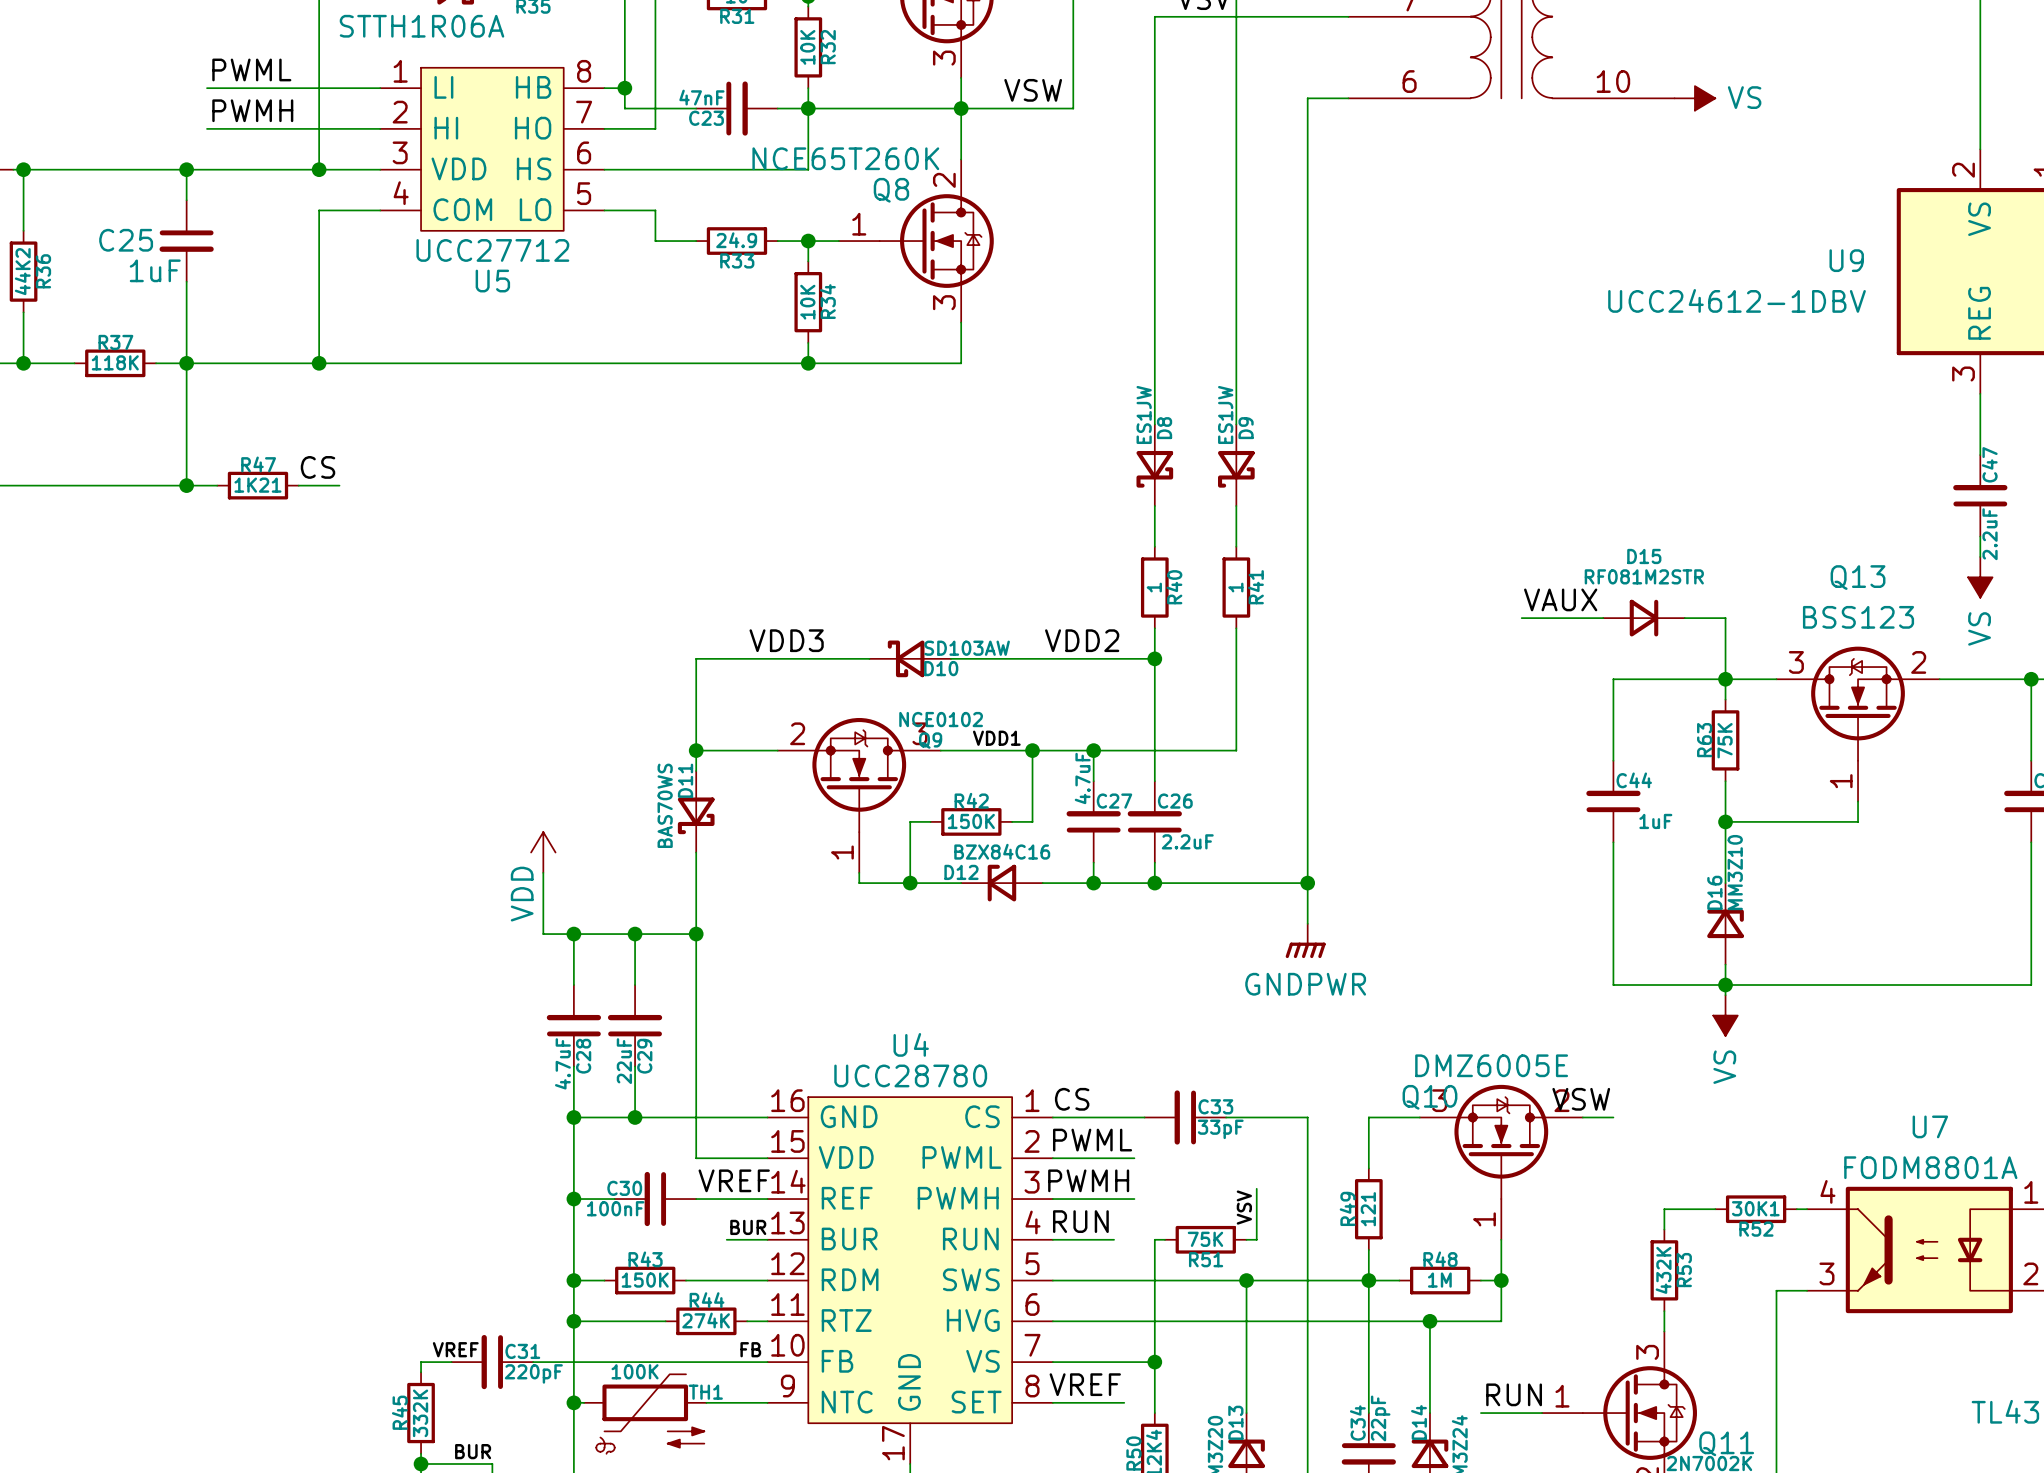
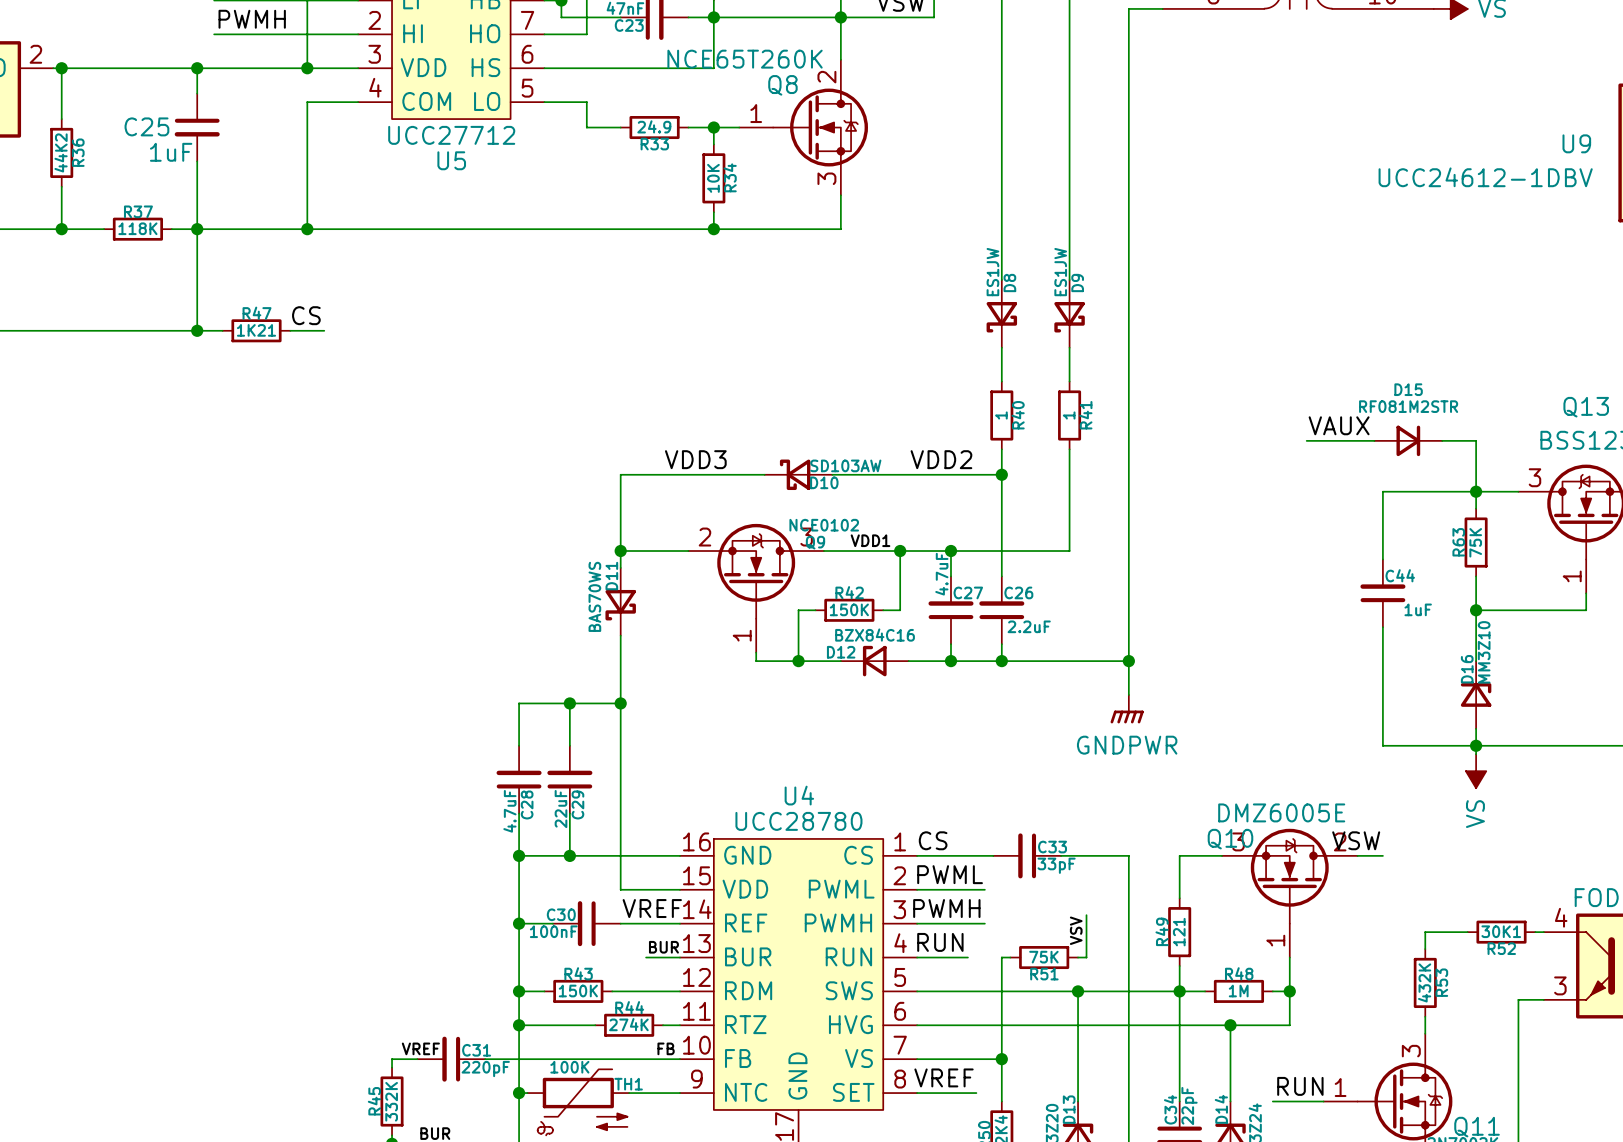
power symbol: VDD (543, 852) -> none
wire: (543, 872) (543, 934) (573, 934) -> none
junction: (573, 934) -> none

